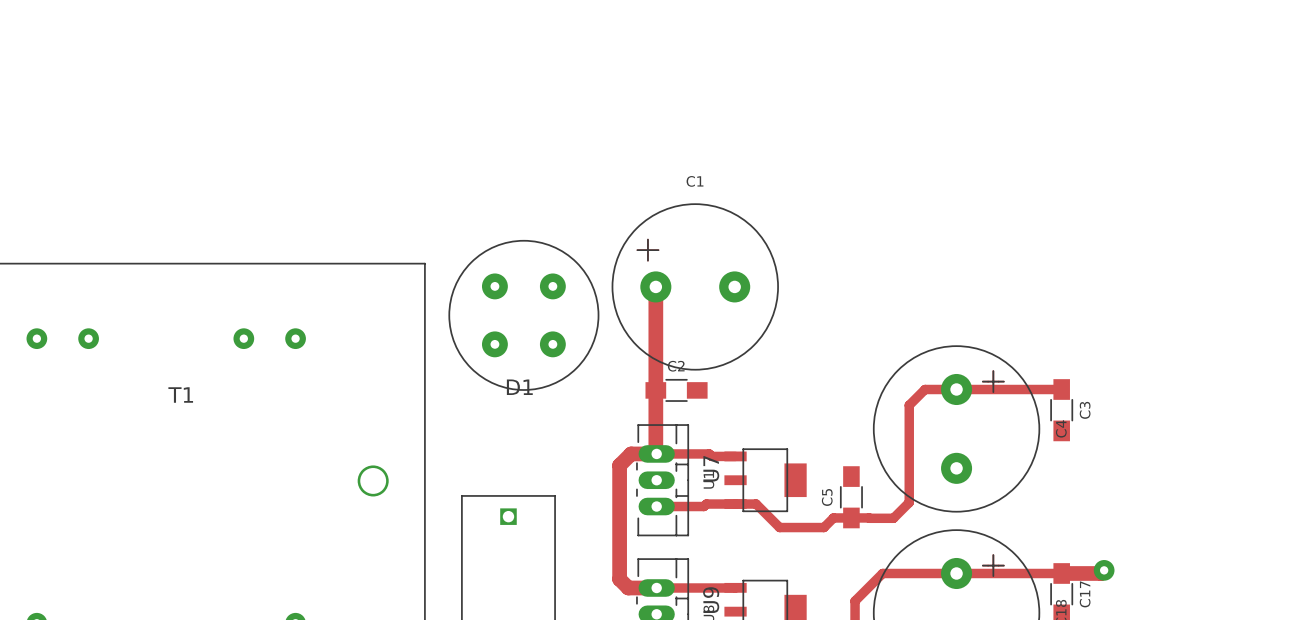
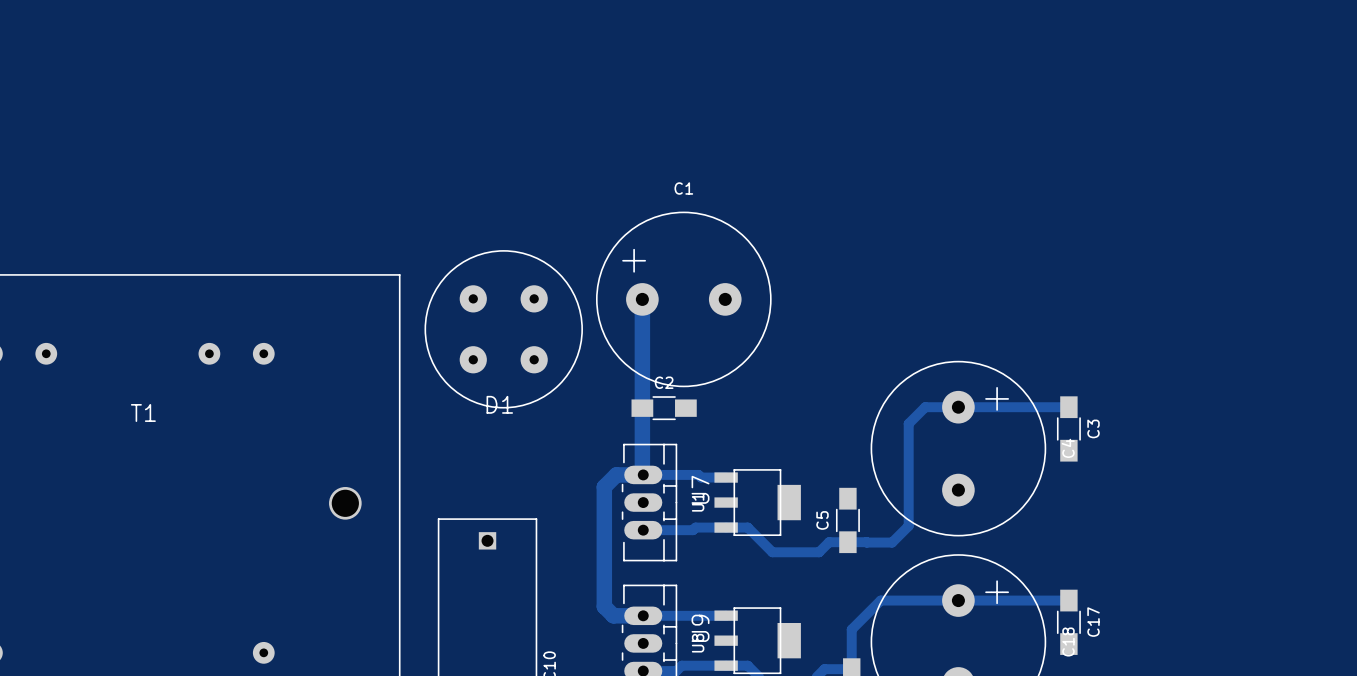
track: (1104, 570) (1101, 573) (1061, 573) -> none
via: (1104, 570) -> none

